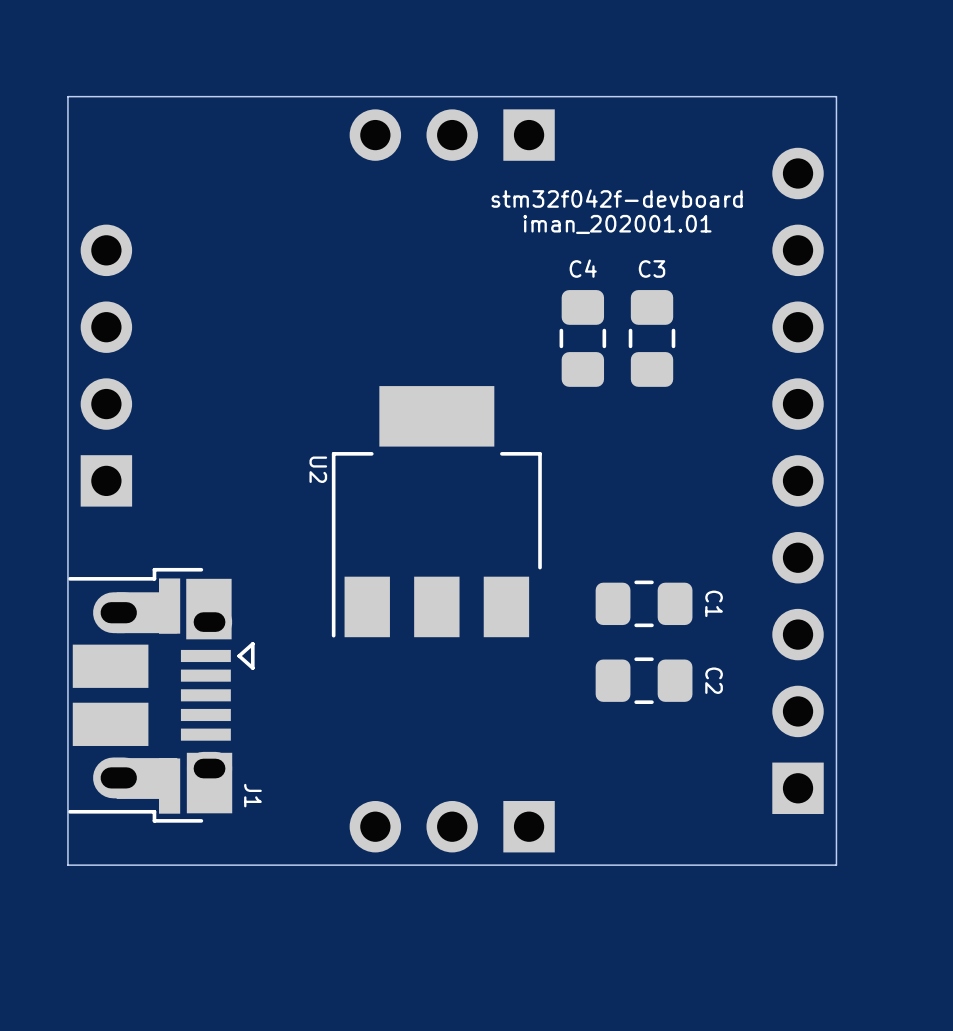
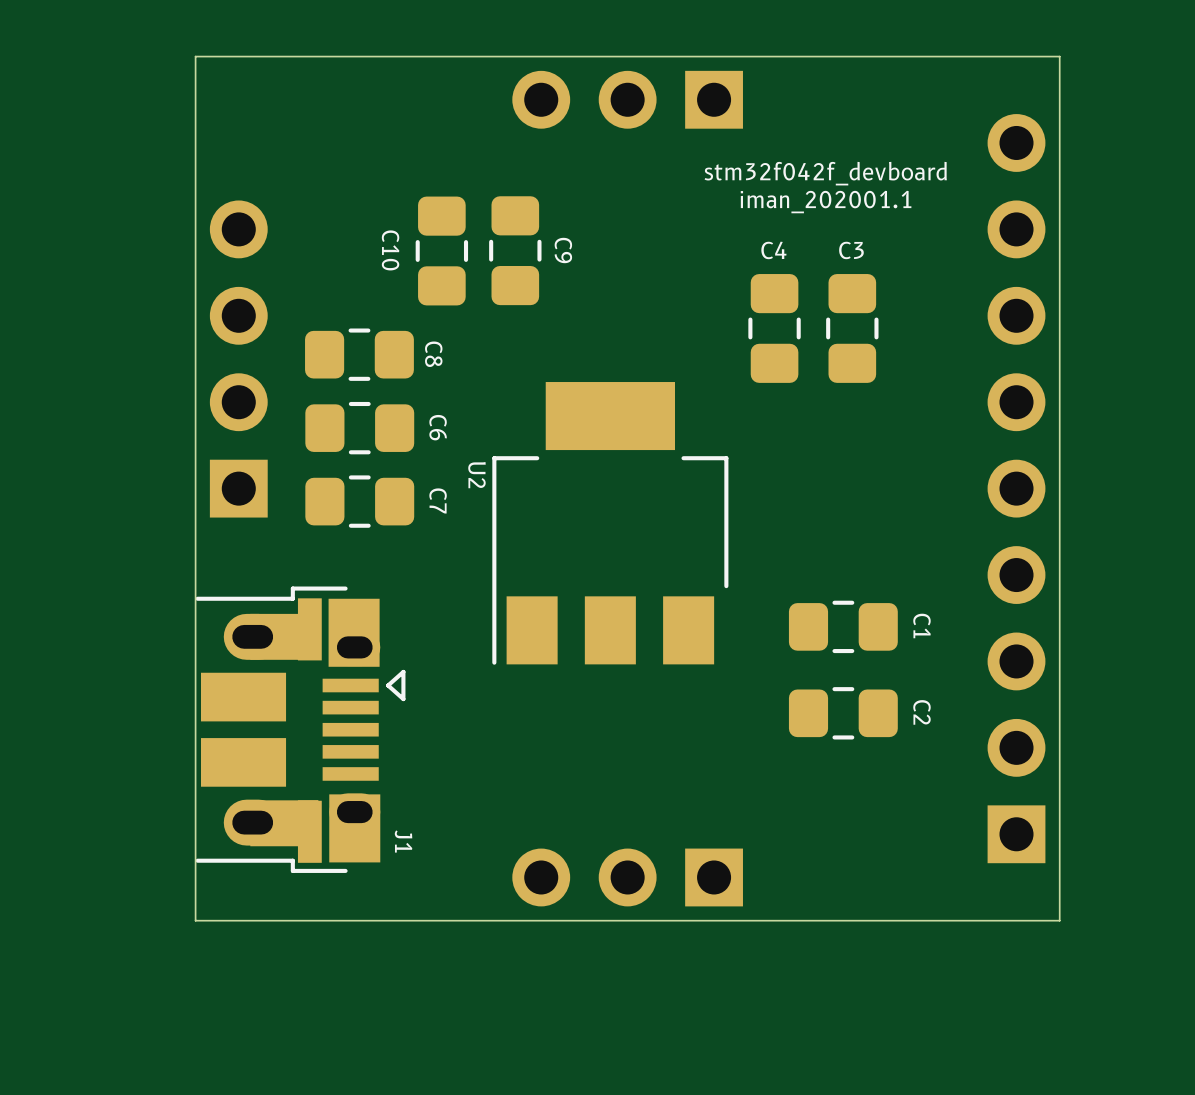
text: stm32f042f-devboard (617, 198) -> stm32f042f_devboard (825, 173)
text: iman_202001.01 (617, 224) -> iman_202001.1 (826, 202)
C10: none -> (441, 251)
C9: none -> (515, 250)
C8: none -> (359, 354)
C6: none -> (359, 428)
C7: none -> (359, 501)

